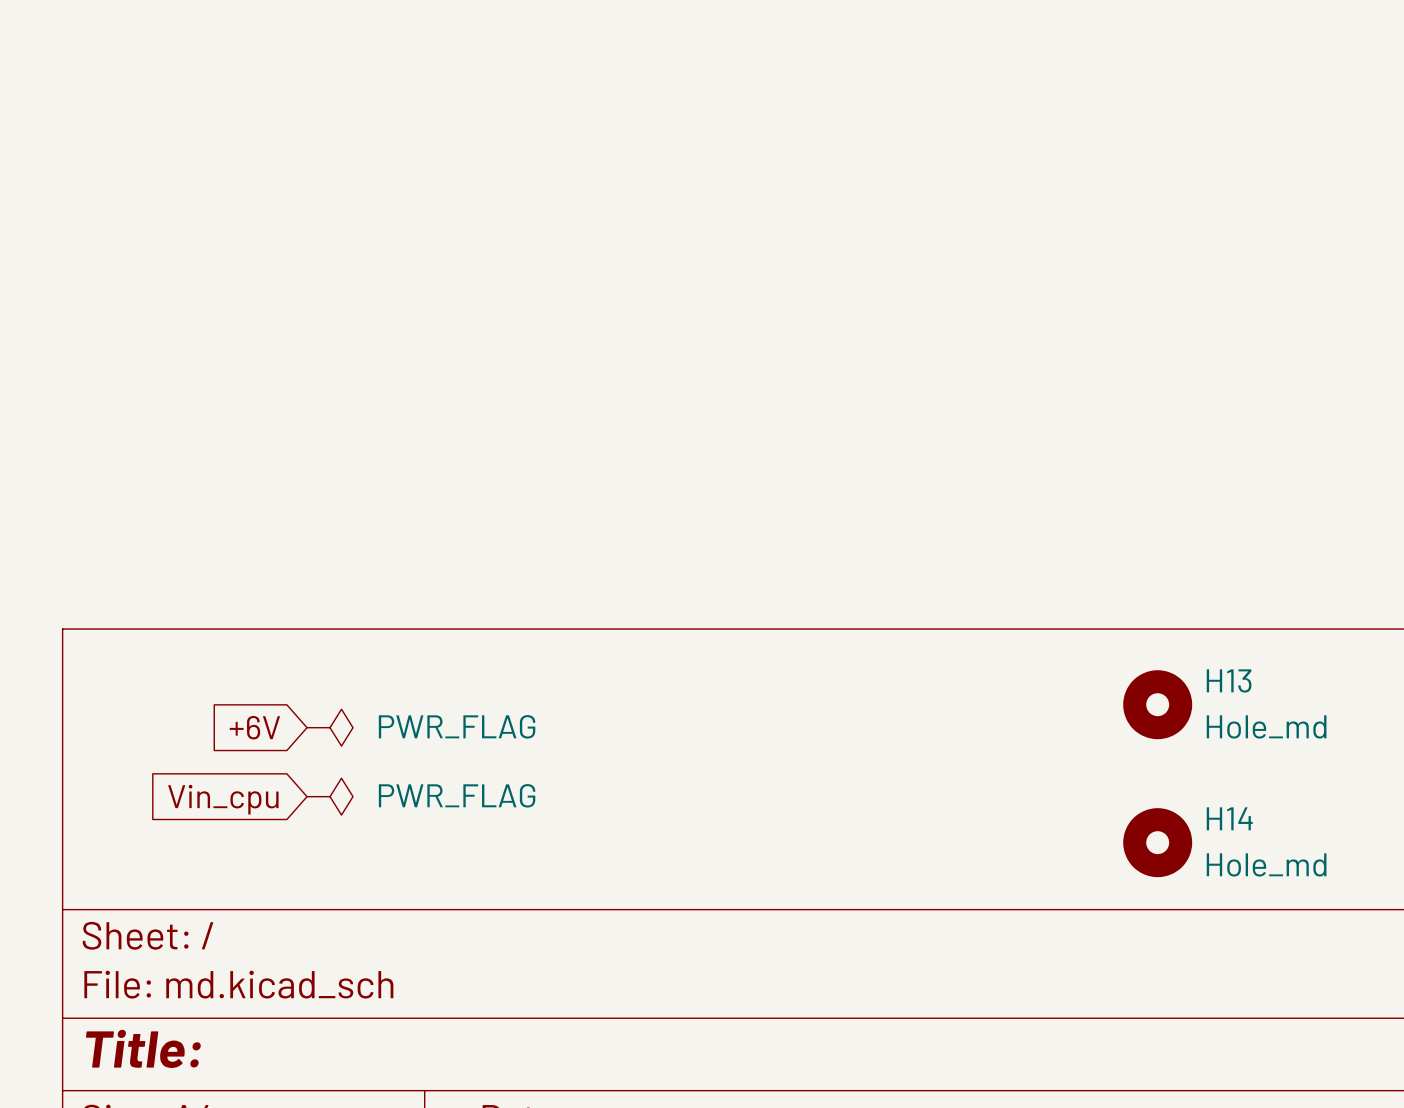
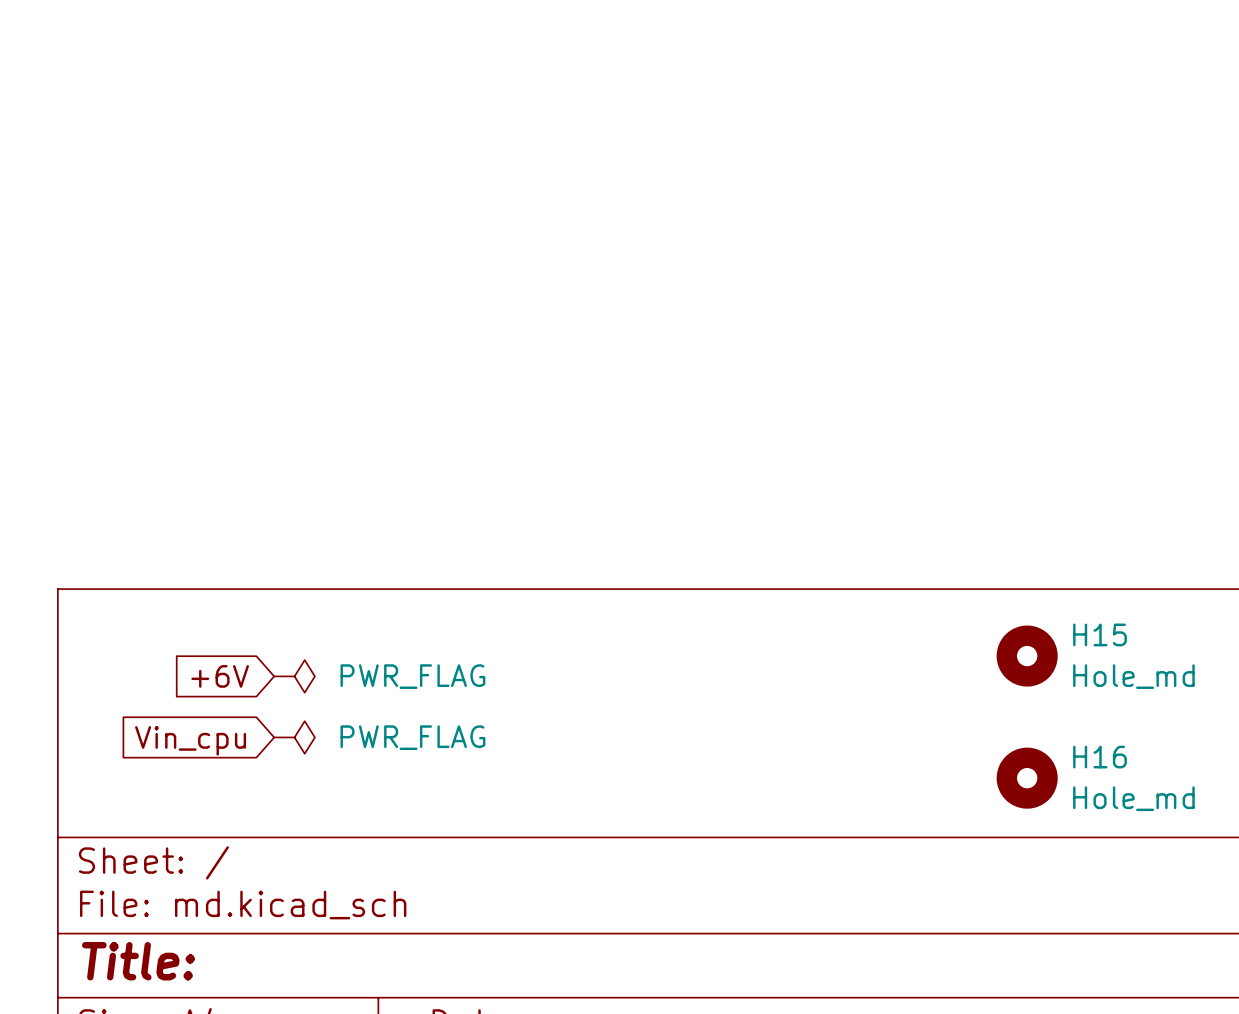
H13 name: H13 (1229, 680) -> H15 (1100, 634)
H14 name: H14 (1229, 818) -> H16 (1100, 757)

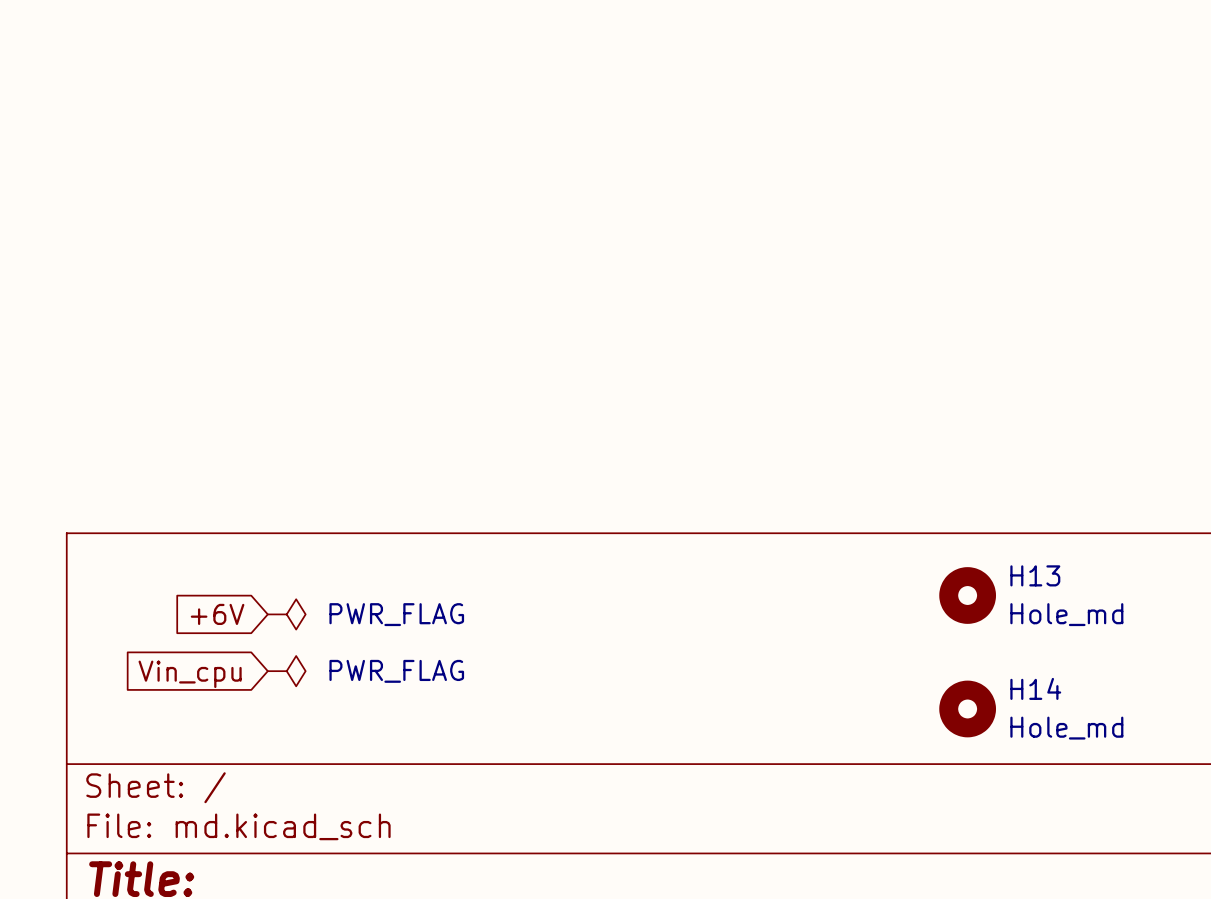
H15 name: H15 (1100, 634) -> H13 (1035, 575)
H16 name: H16 (1100, 757) -> H14 (1035, 688)

